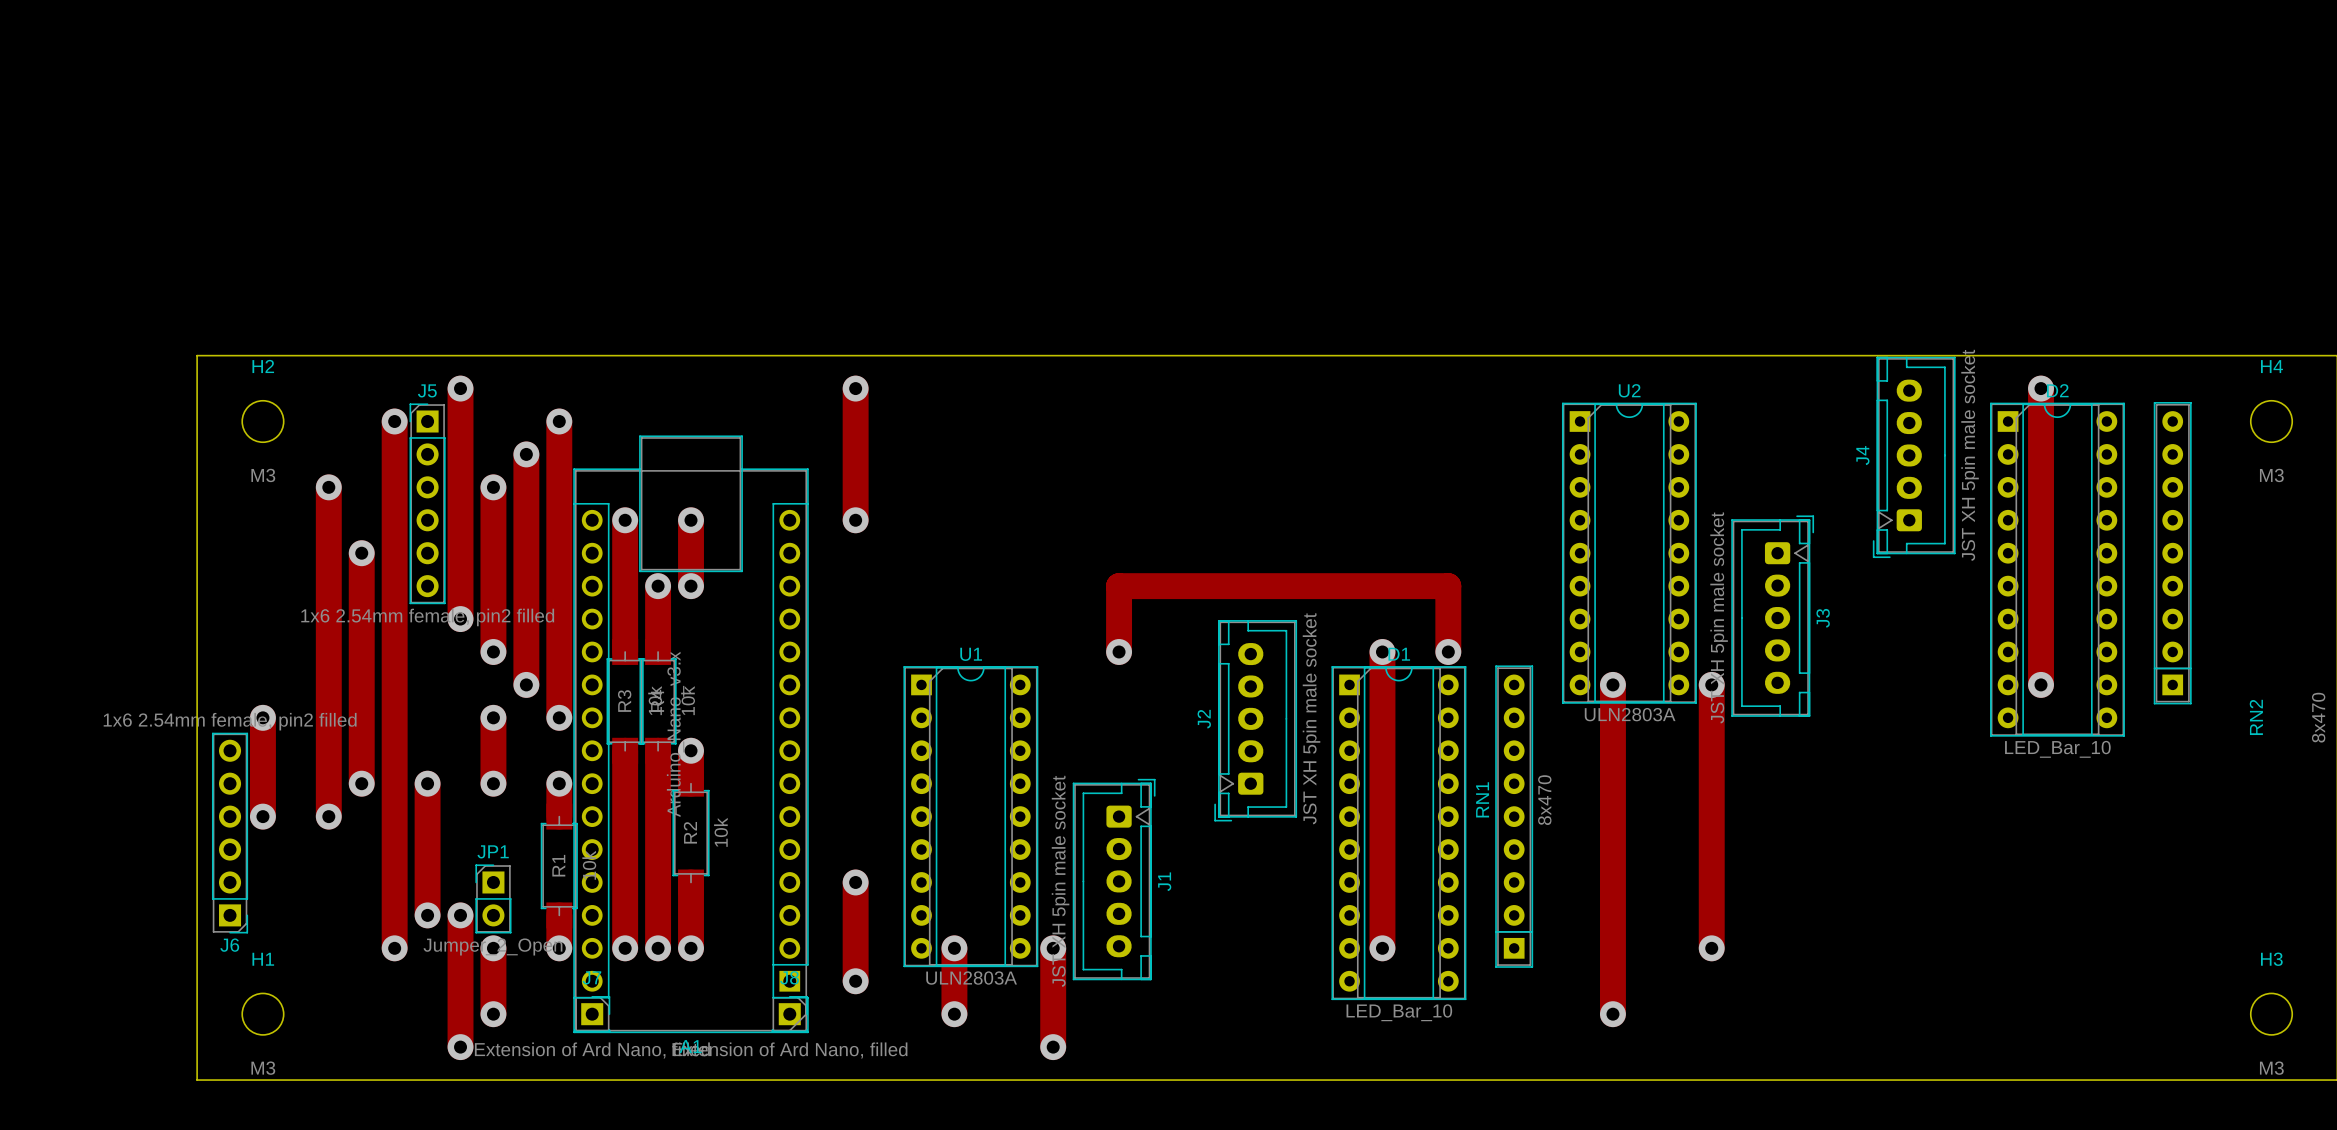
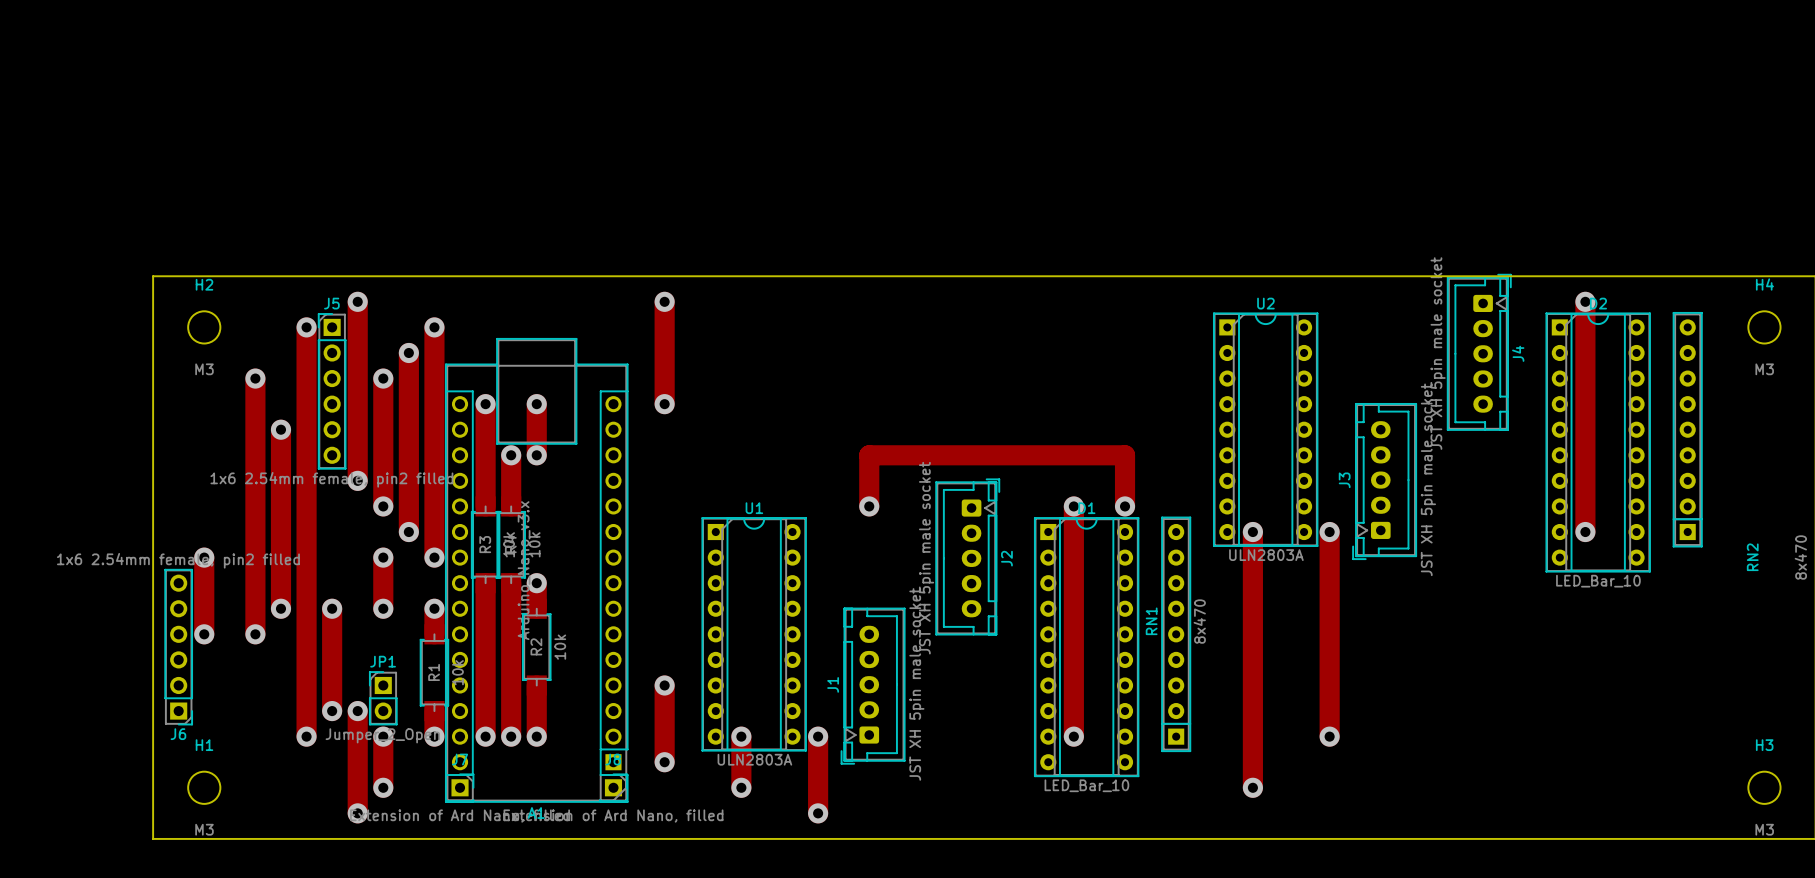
J4 rotation: 0° (1914, 457) -> 180° (1479, 352)
J3 rotation: 0° (1772, 616) -> 180° (1384, 481)
J2 rotation: 0° (1255, 720) -> 180° (967, 556)
J1 rotation: 0° (1114, 879) -> 180° (873, 686)

